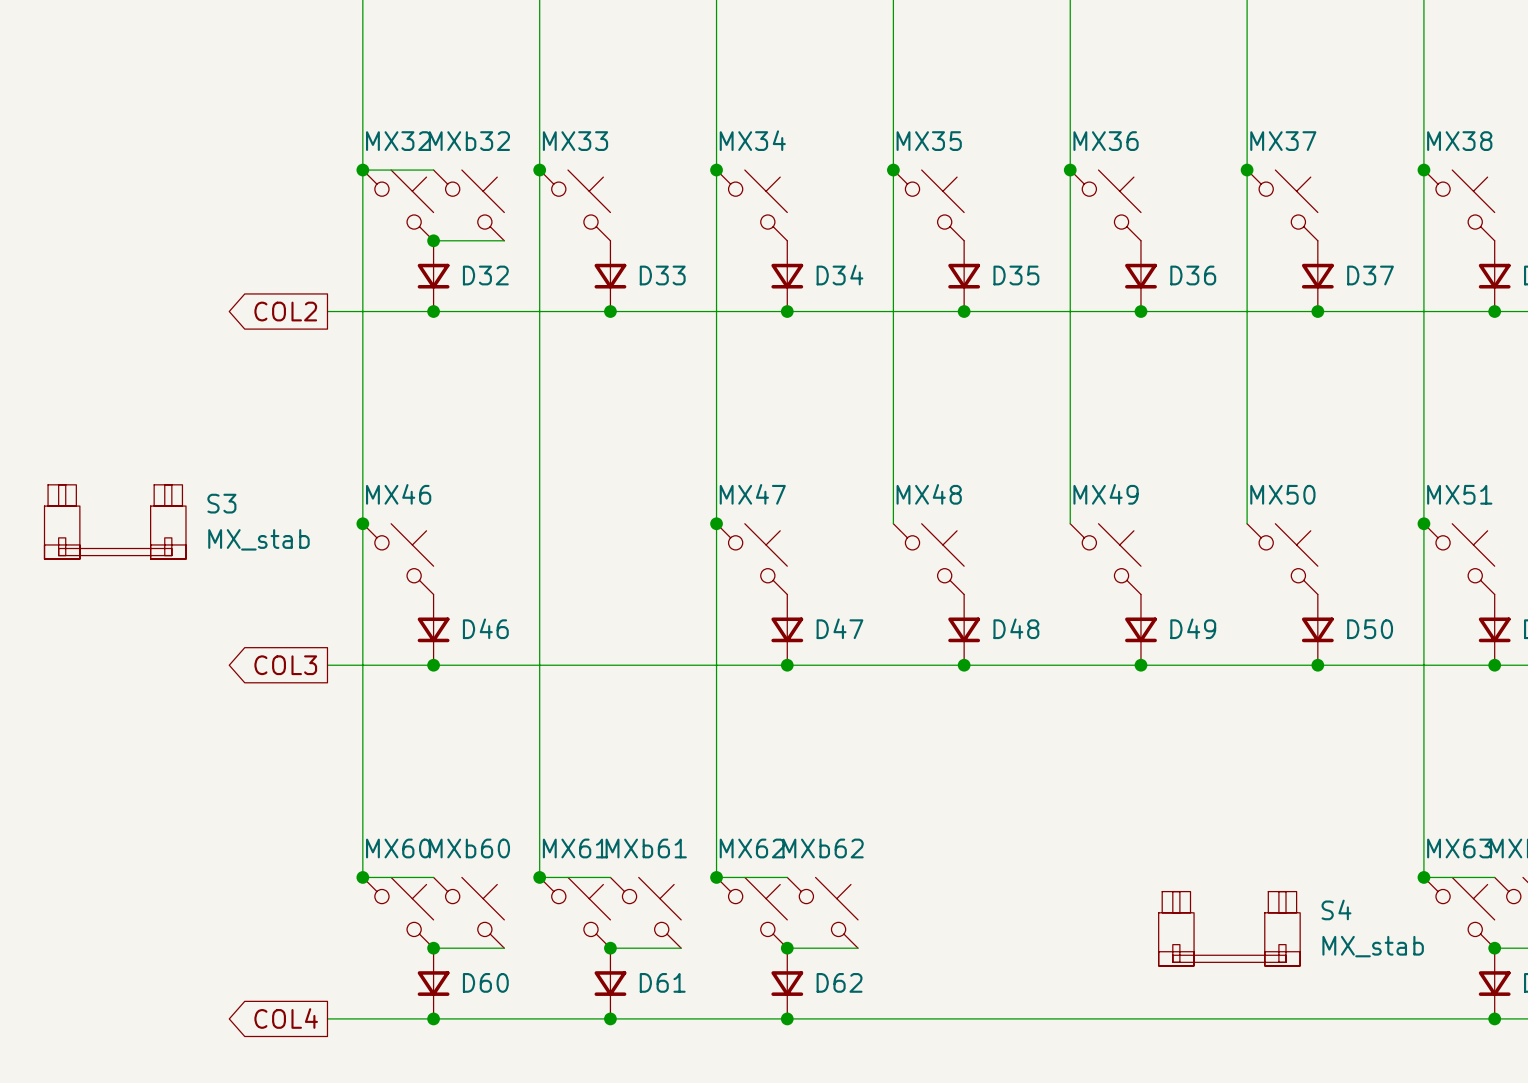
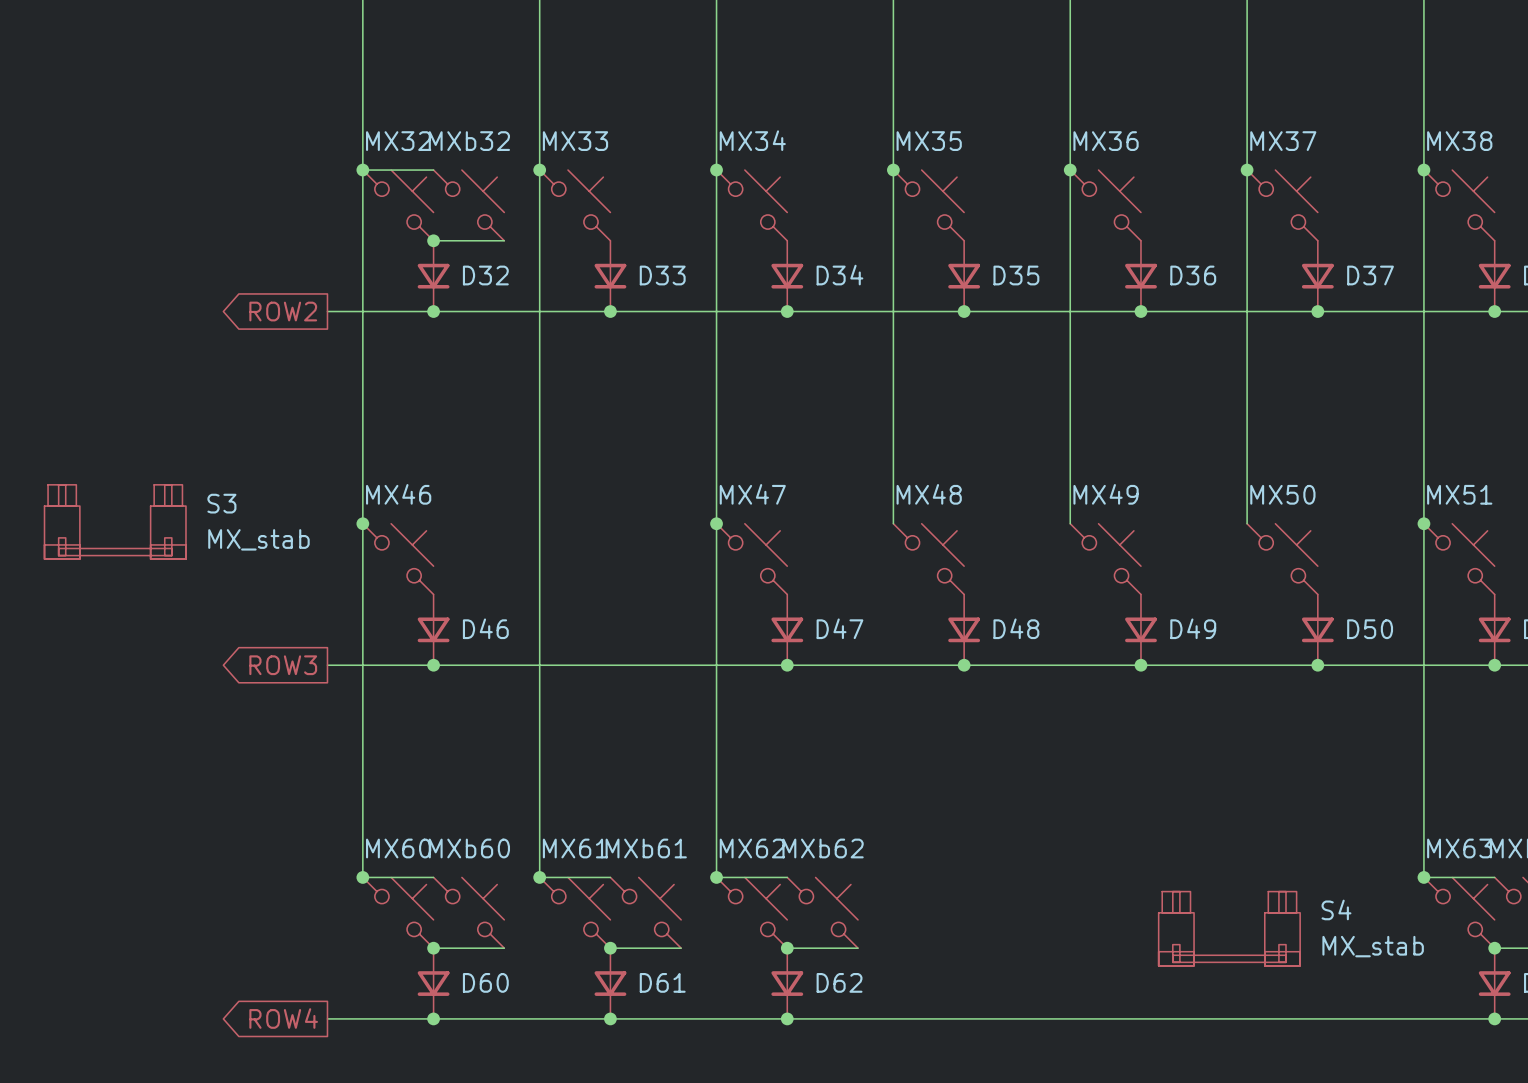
global label: COL2 (285, 311) -> ROW2 (283, 311)
global label: COL3 (285, 665) -> ROW3 (283, 665)
global label: COL4 (286, 1018) -> ROW4 (283, 1018)

